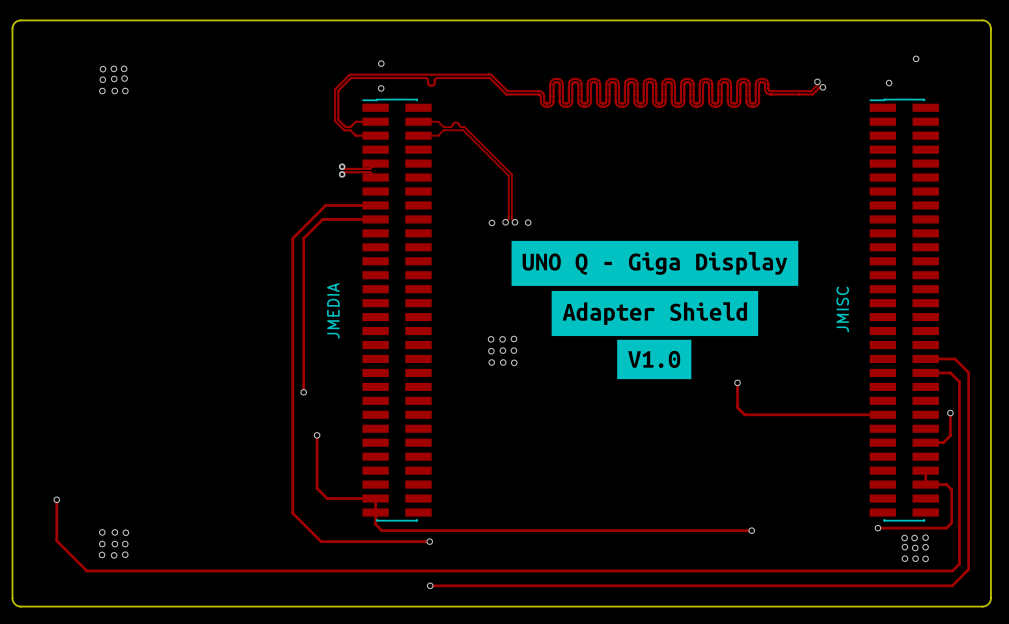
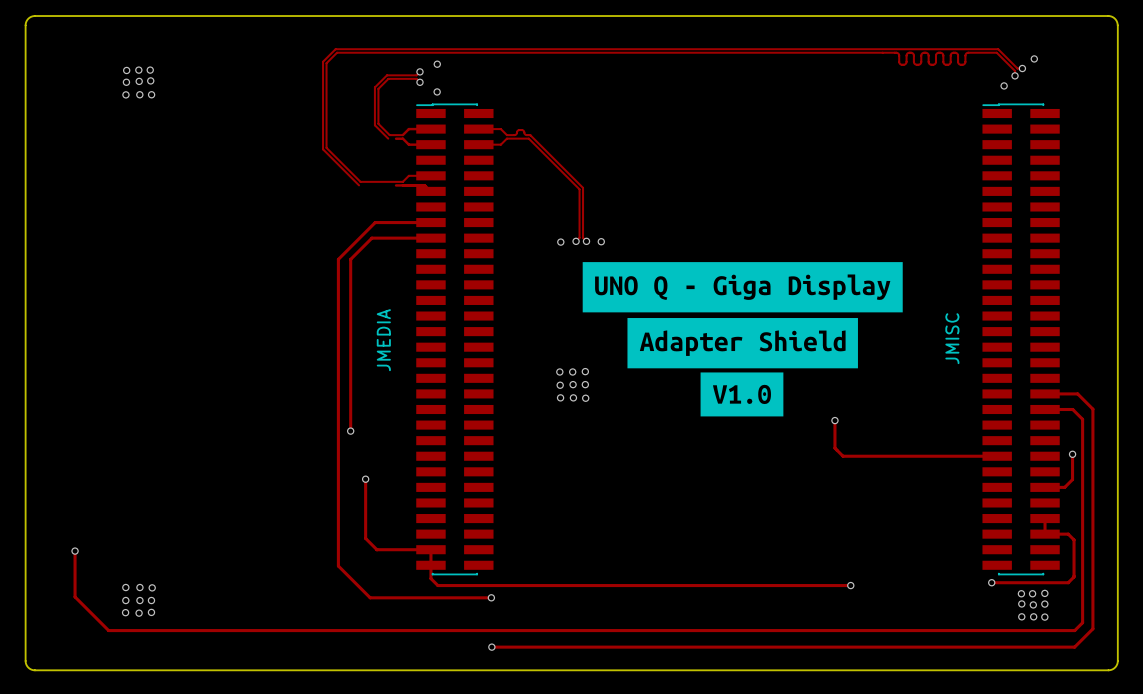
track: none -> (1022, 68) (1017, 68) (998, 49) (335, 49) (323, 61) (323, 149) (359, 185)
via: none -> (1022, 68)
track: none -> (419, 71) (416, 75) (386, 75) (374, 87) (374, 125) (388, 138)
via: none -> (419, 71)
via: none -> (1015, 75)
via: none -> (419, 82)
track: (817, 81) (817, 84) (811, 91) (770, 91) (766, 80) (759, 79) (755, 83) (755, 101) (751, 103) (749, 101) (749, 82) (746, 79) (741, 79) (737, 83) (737, 101) (733, 103) (731, 101) (730, 82) (727, 79) (722, 79) (718, 83) (718, 101) (714, 103) (712, 101) (711, 82) (709, 79) (704, 79) (699, 82) (699, 102) (695, 103) (693, 101) (693, 82) (690, 79) (685, 79) (681, 82) (680, 102) (677, 103) (675, 101) (674, 82) (671, 79) (667, 79) (662, 82) (662, 102) (658, 103) (656, 101) (655, 82) (652, 79) (648, 79) (643, 82) (643, 102) (639, 103) (637, 101) (637, 82) (634, 79) (629, 79) (625, 82) (624, 102) (621, 103) (618, 101) (618, 82) (615, 79) (610, 79) (606, 82) (606, 102) (602, 103) (600, 101) (599, 82) (596, 79) (592, 79) (587, 82) (587, 102) (583, 103) (581, 101) (581, 82) (578, 79) (573, 79) (569, 82) (568, 102) (564, 103) (562, 101) (562, 82) (559, 79) (554, 79) (550, 82) (550, 102) (546, 103) (541, 91) (507, 91) (491, 74) (349, 74) (335, 89) (335, 120) (344, 130) -> none
via: (817, 81) -> none
track: (822, 87) (819, 87) (812, 94) (769, 94) (765, 91) (764, 83) (760, 82) (758, 103) (751, 106) (746, 102) (746, 83) (741, 82) (739, 103) (733, 106) (728, 103) (727, 83) (723, 82) (721, 84) (721, 103) (714, 106) (709, 103) (708, 83) (704, 82) (703, 84) (702, 103) (695, 106) (690, 103) (690, 83) (686, 82) (684, 84) (683, 103) (677, 106) (672, 103) (671, 83) (667, 82) (665, 84) (665, 103) (658, 106) (653, 103) (652, 83) (648, 82) (646, 84) (646, 103) (639, 106) (634, 103) (634, 83) (630, 82) (628, 84) (627, 103) (621, 106) (616, 103) (615, 83) (611, 82) (609, 84) (609, 103) (602, 106) (597, 103) (596, 83) (592, 82) (590, 84) (590, 103) (583, 106) (578, 103) (578, 83) (574, 82) (572, 84) (571, 103) (564, 106) (560, 103) (559, 83) (555, 82) (553, 84) (553, 103) (546, 106) (541, 104) (539, 94) (506, 94) (489, 78) (437, 78) (432, 85) (428, 84) (425, 78) (351, 78) (338, 90) (338, 119) (345, 127) (350, 127) -> (419, 82) (416, 78) (388, 78) (378, 88) (378, 123) (389, 135) (402, 135)
via: (822, 87) -> none
track: (375, 163) (370, 168) (344, 168) (342, 166) -> (430, 175) (408, 175) (402, 181) (360, 181) (326, 147) (326, 63) (337, 52) (896, 52) (899, 54) (899, 63) (902, 64) (906, 63) (906, 55) (909, 52) (913, 54) (914, 62) (916, 64) (920, 63) (923, 52) (928, 54) (928, 62) (931, 64) (935, 63) (936, 53) (941, 53) (943, 63) (947, 64) (950, 62) (951, 54) (955, 52) (957, 55) (958, 63) (962, 64) (965, 62) (967, 52) (996, 52) (1015, 70) (1015, 75)
via: (342, 166) -> none
via: (342, 174) -> none

